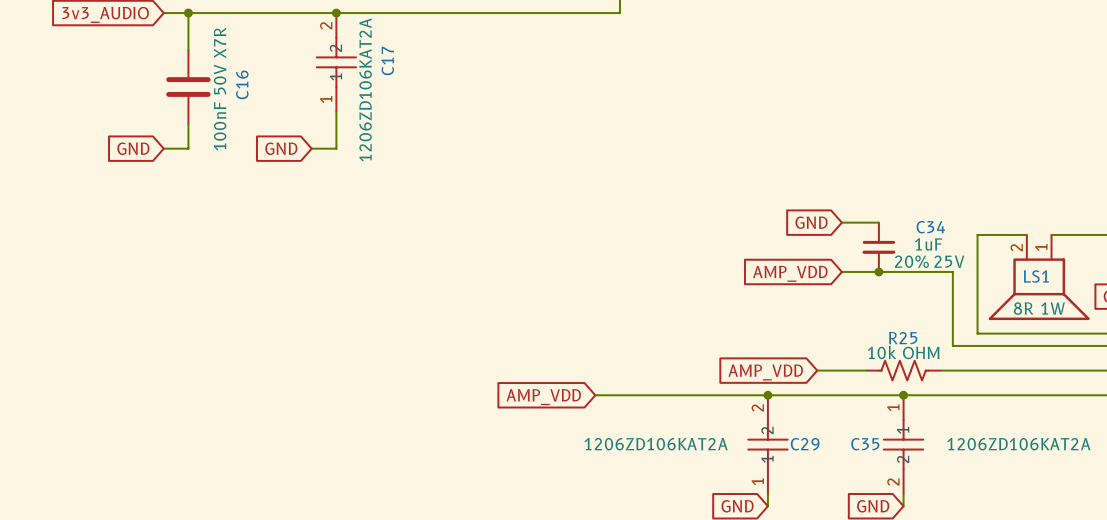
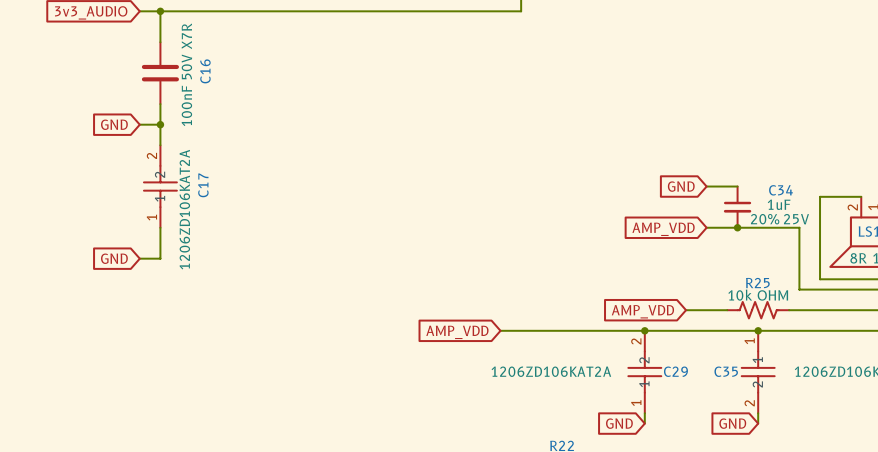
junction: (336, 13) -> none
C17 position: (336, 62) -> (160, 186)
wire: (336, 111) (336, 148) (311, 148) -> (160, 227) (160, 258) (139, 258)
wire: none -> (160, 124) (160, 145)
junction: none -> (160, 124)
global label position: GND (281, 148) -> GND (114, 258)

